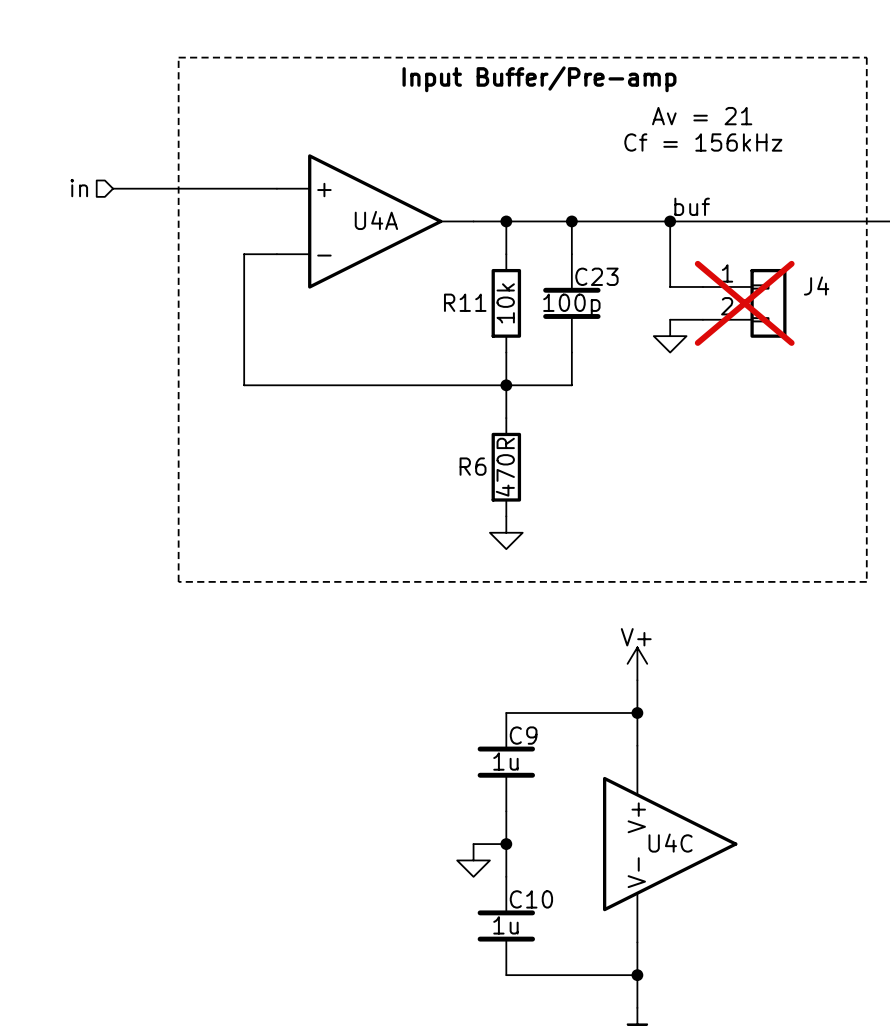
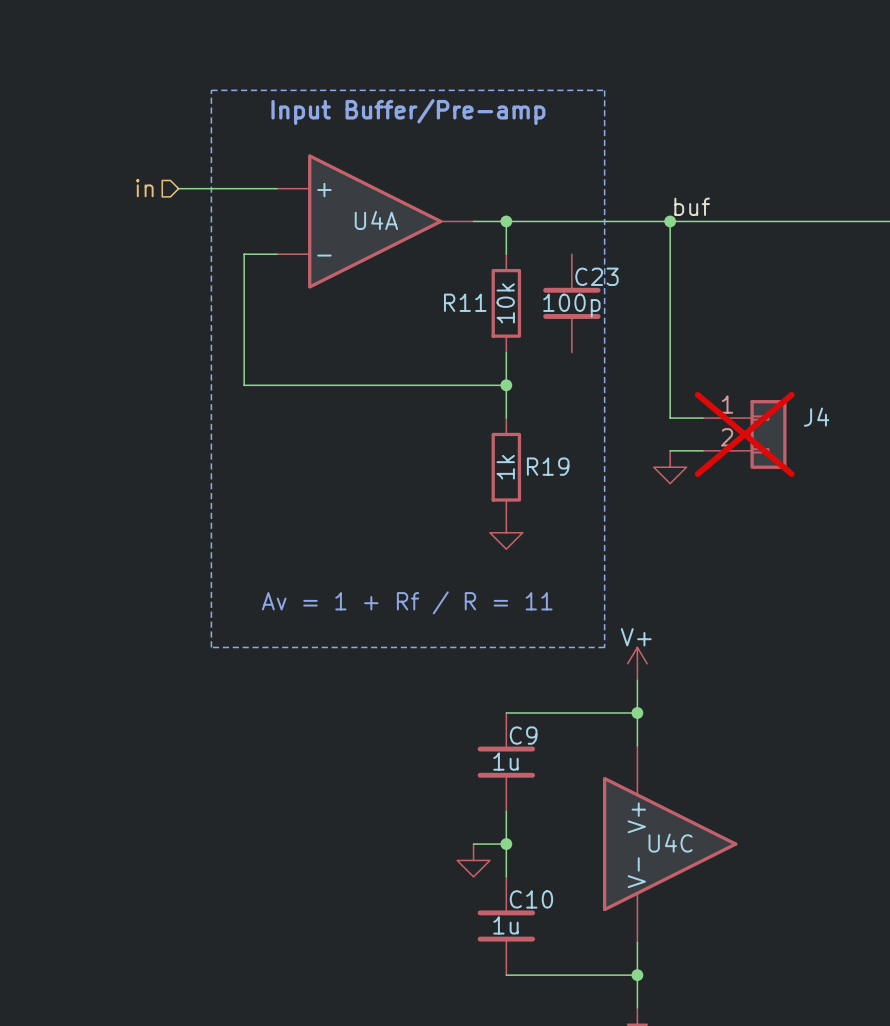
line: (178, 57) (866, 57) (866, 581) (178, 581) (178, 57) -> none
text position: Input Buffer/Pre-amp (539, 79) -> Input Buffer/Pre-amp (408, 112)
line: none -> (211, 90) (604, 90) (604, 647) (211, 647) (211, 90)
text: Av = 21 (702, 116) -> none
text: Cf = 156kHz (703, 142) -> none
hierarchical label position: in (79, 188) -> in (144, 188)
wire: (113, 188) (178, 188) -> none
wire: (571, 221) (571, 254) -> none
junction: (571, 221) -> none
wire: (670, 286) (702, 286) -> (670, 286) (670, 418) (702, 418)
J4 position: (744, 303) -> (744, 434)
wire: (670, 319) (702, 319) -> (670, 450) (702, 450)
power symbol position: (670, 336) -> (670, 467)
wire: (571, 352) (571, 385) (506, 385) -> none
R6 name: R6 (473, 466) -> R19 (548, 466)
R6 value: 470R (505, 467) -> 1k (505, 467)
text: none -> Av = 1 + Rf / R = 11 (407, 602)

